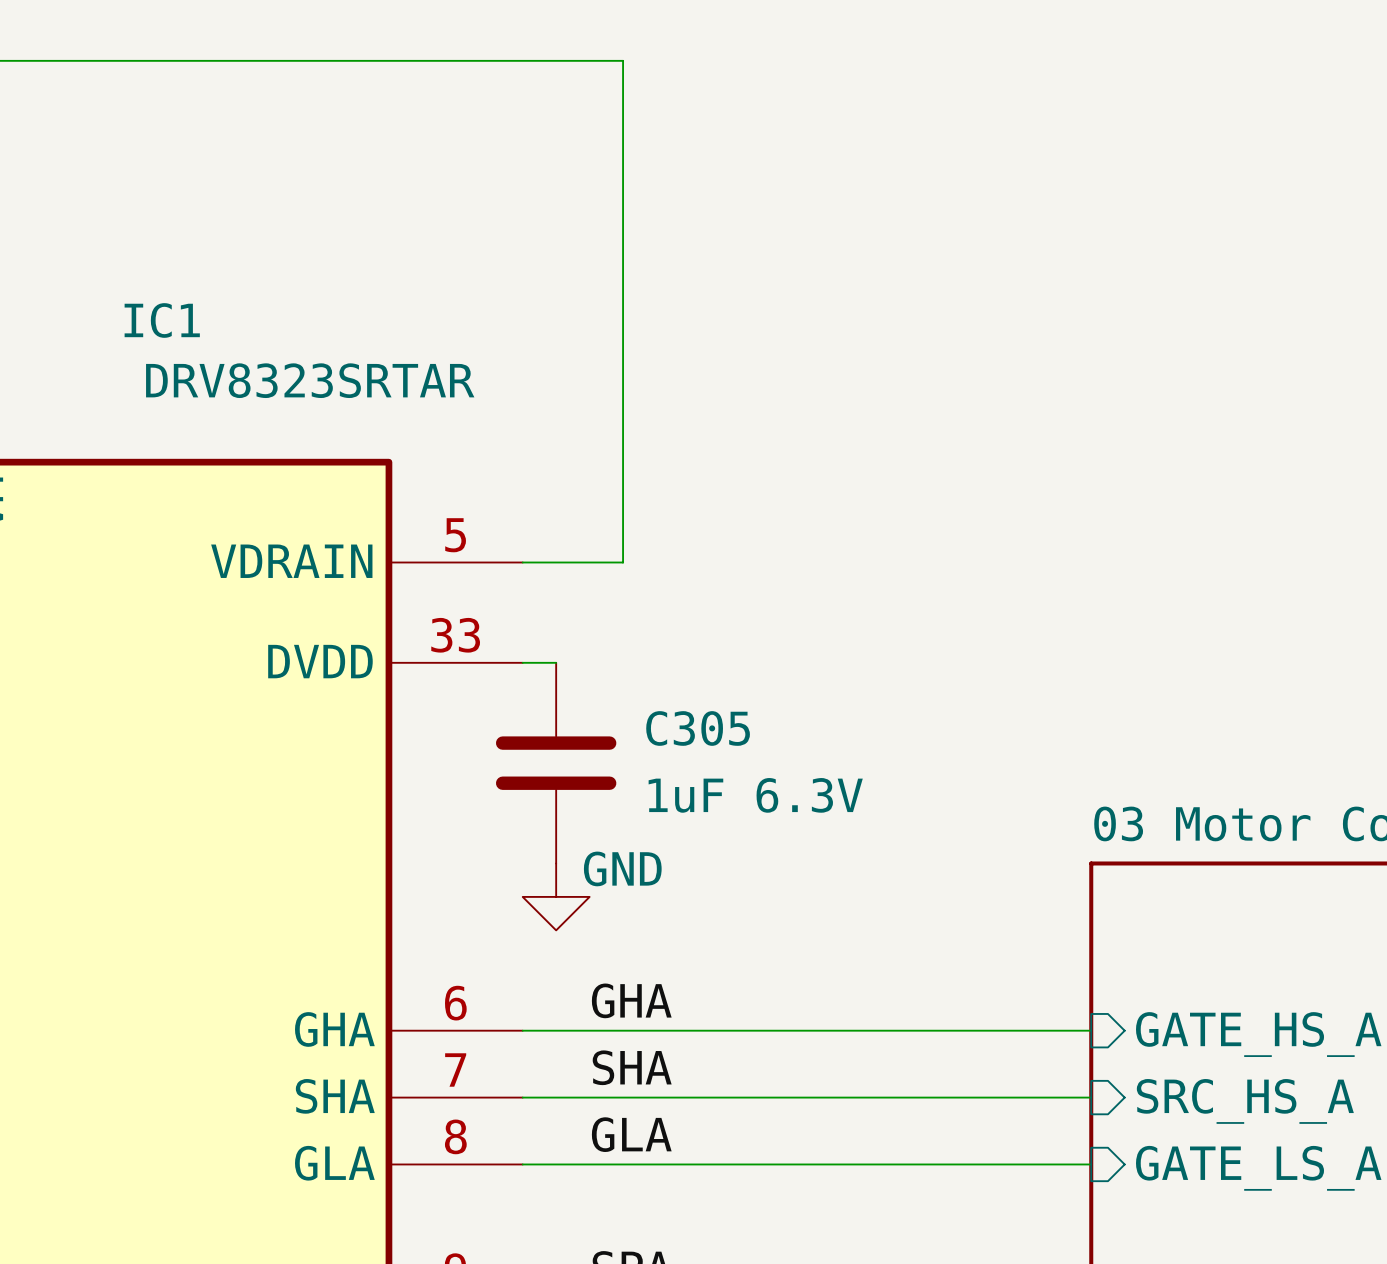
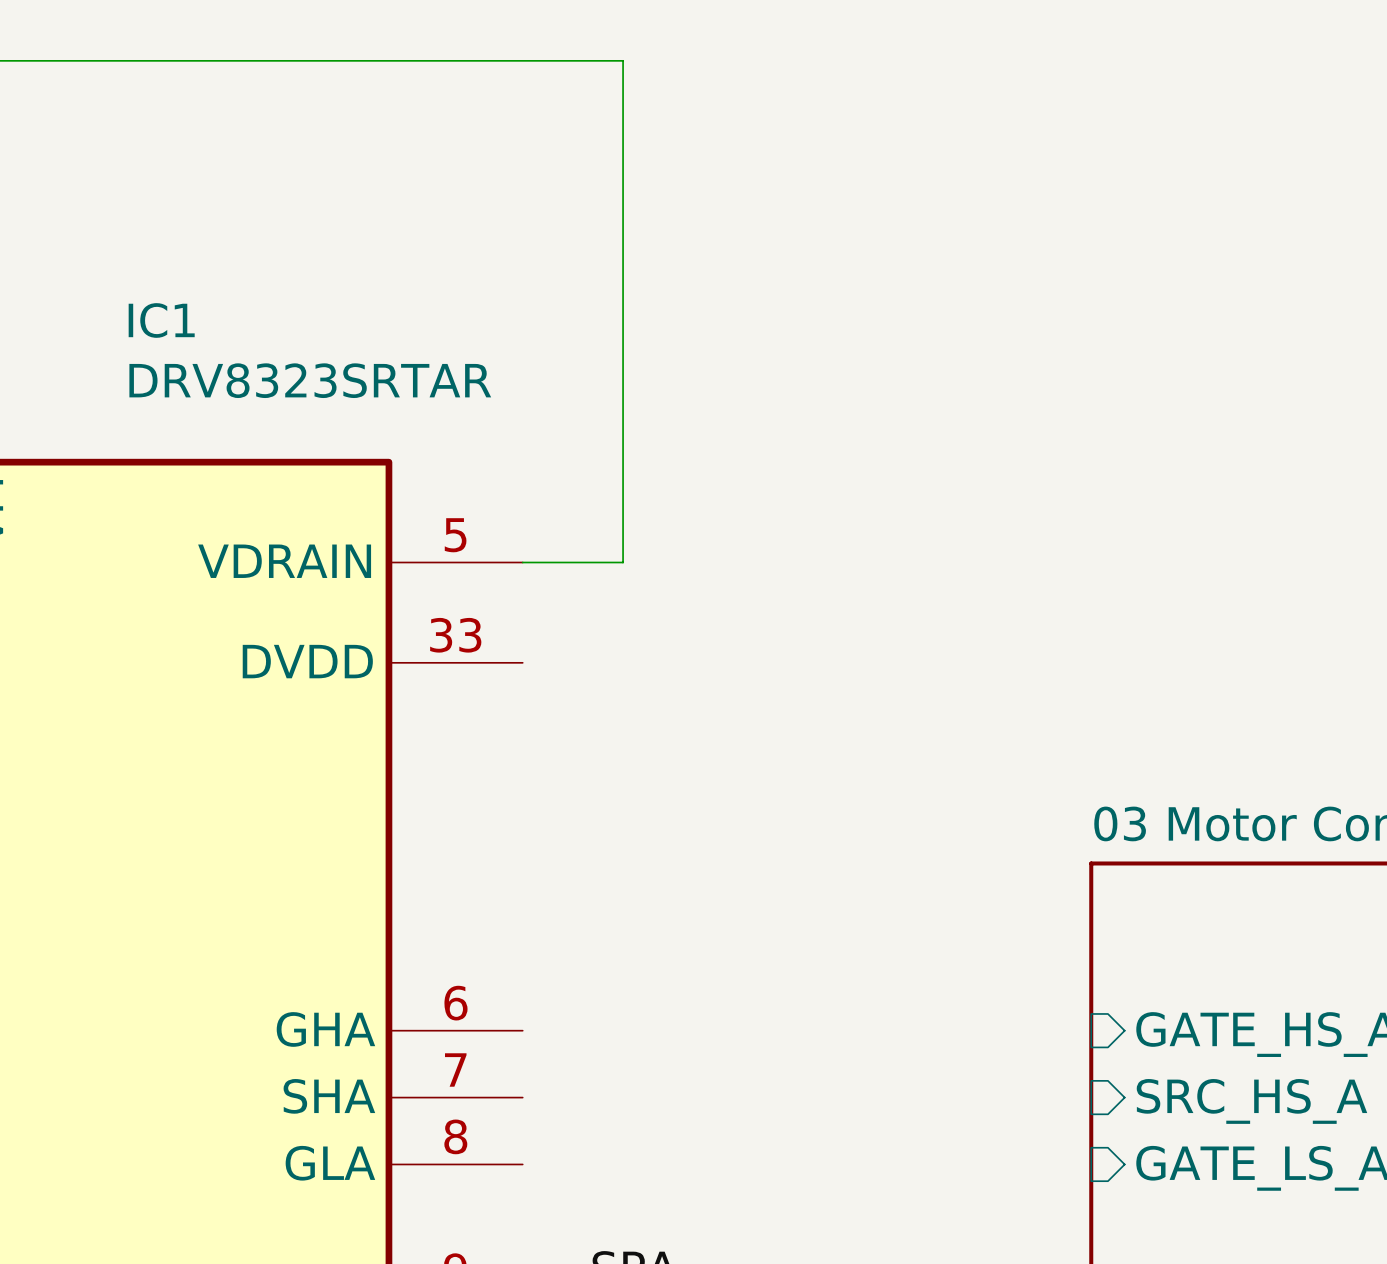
wire: (522, 662) (556, 662) -> none
C305: 1uF 6.3V (556, 763) -> none
power symbol: GND (556, 896) -> none
label: GHA (631, 1000) -> none
wire: (522, 1030) (1091, 1030) -> none
label: SHA (632, 1067) -> none
wire: (522, 1097) (1091, 1097) -> none
label: GLA (631, 1134) -> none
wire: (522, 1164) (1091, 1164) -> none

